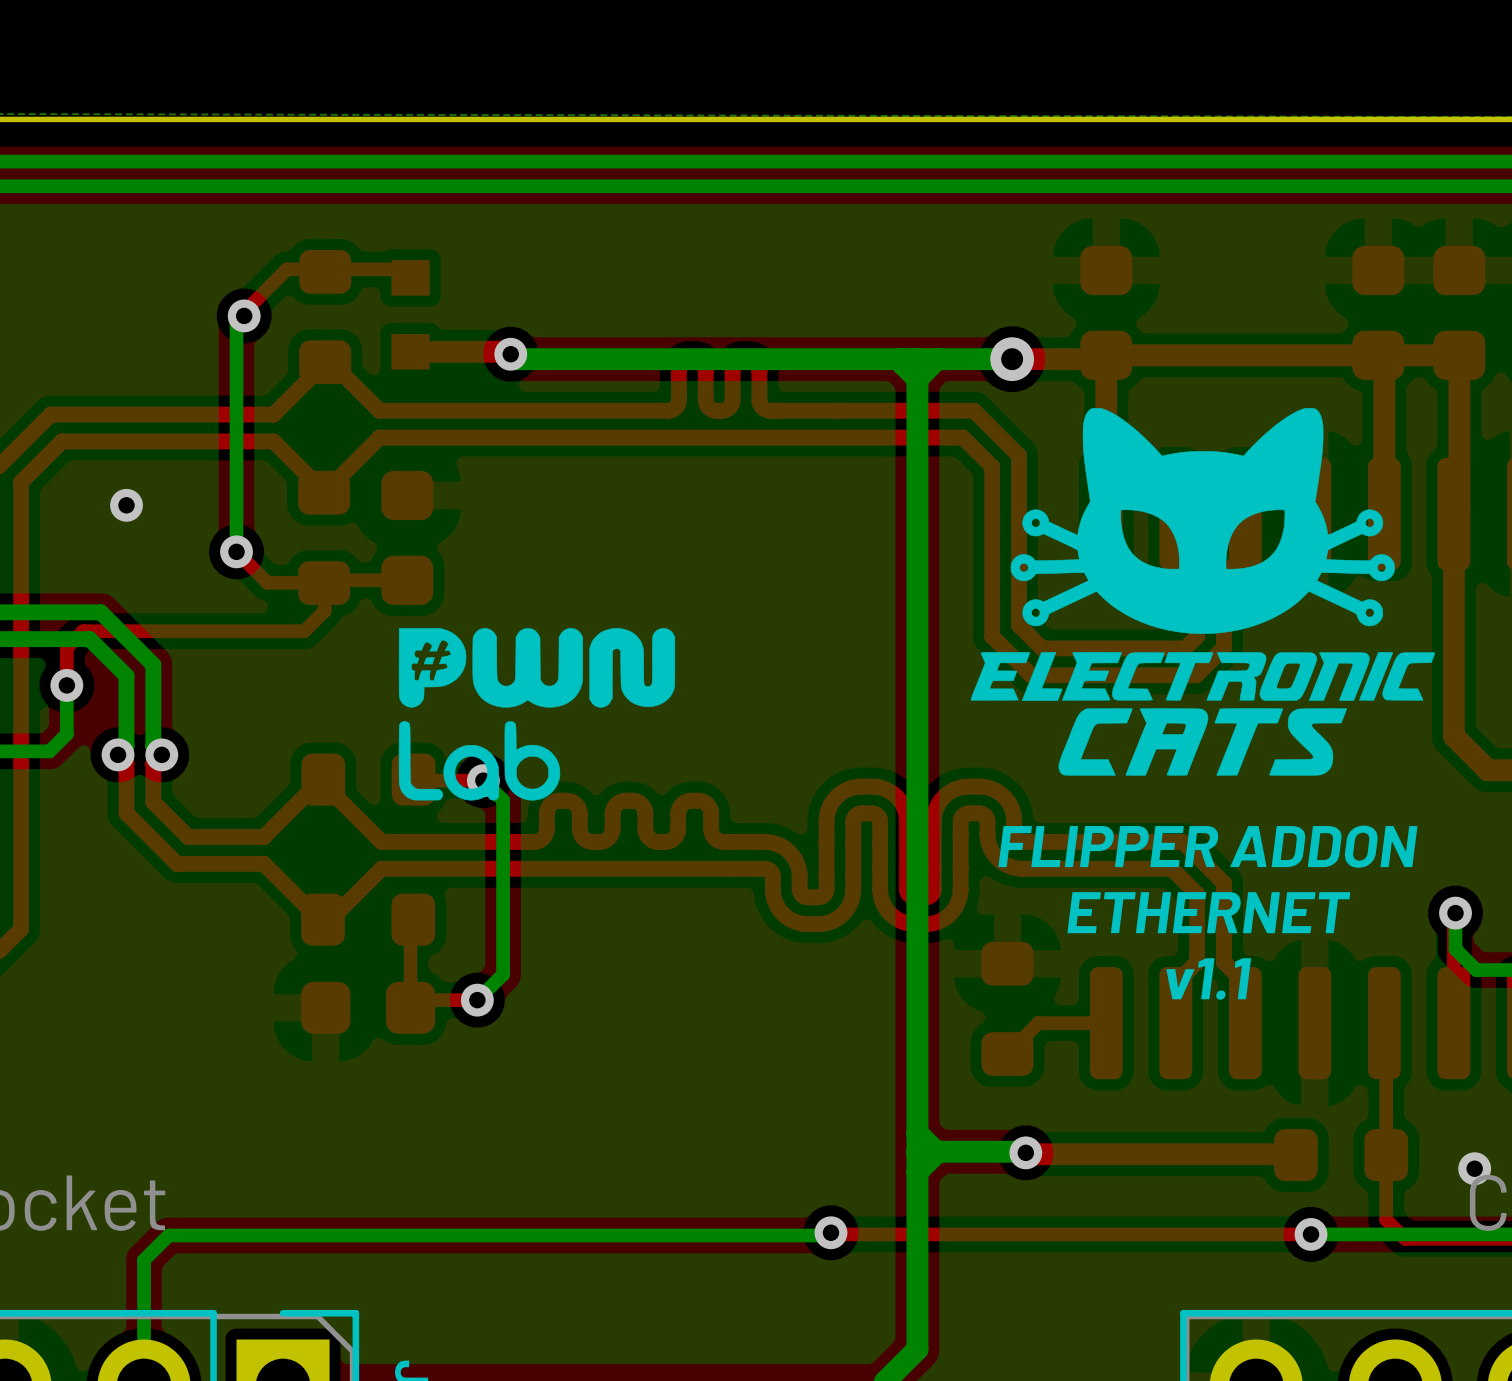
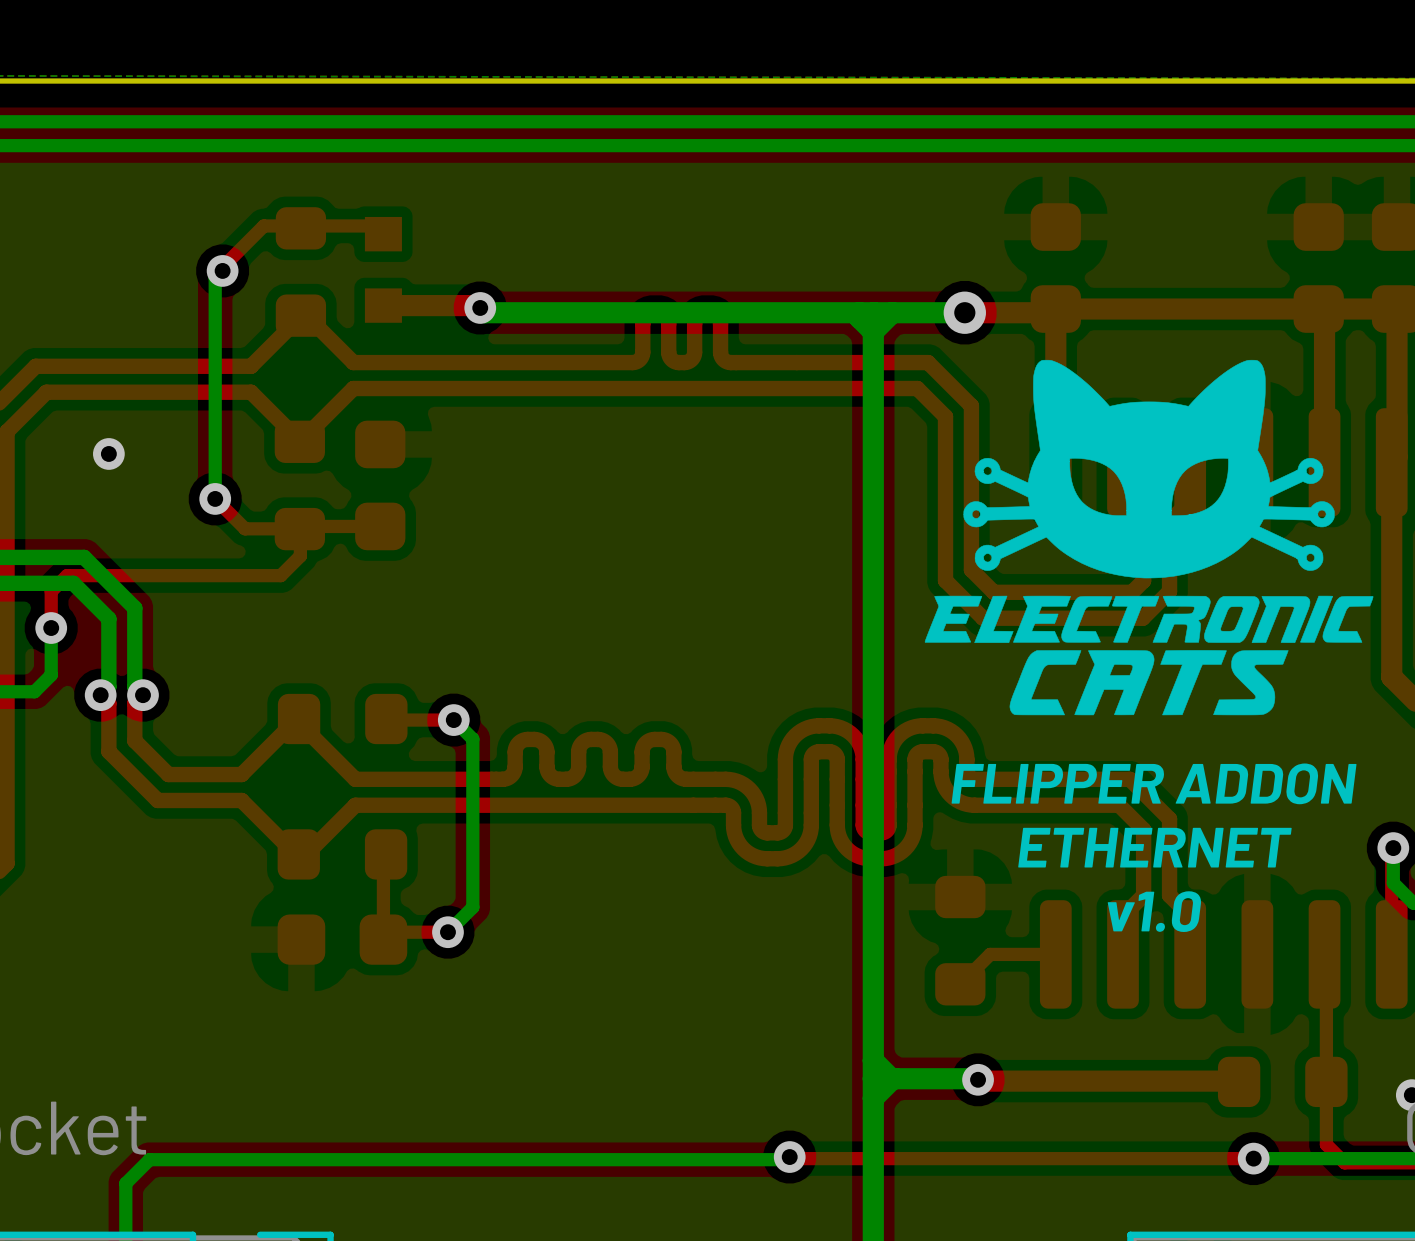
drawing: [398, 628, 676, 801] -> none
text: v1.1 (1208, 979) -> v1.0 (1154, 911)

